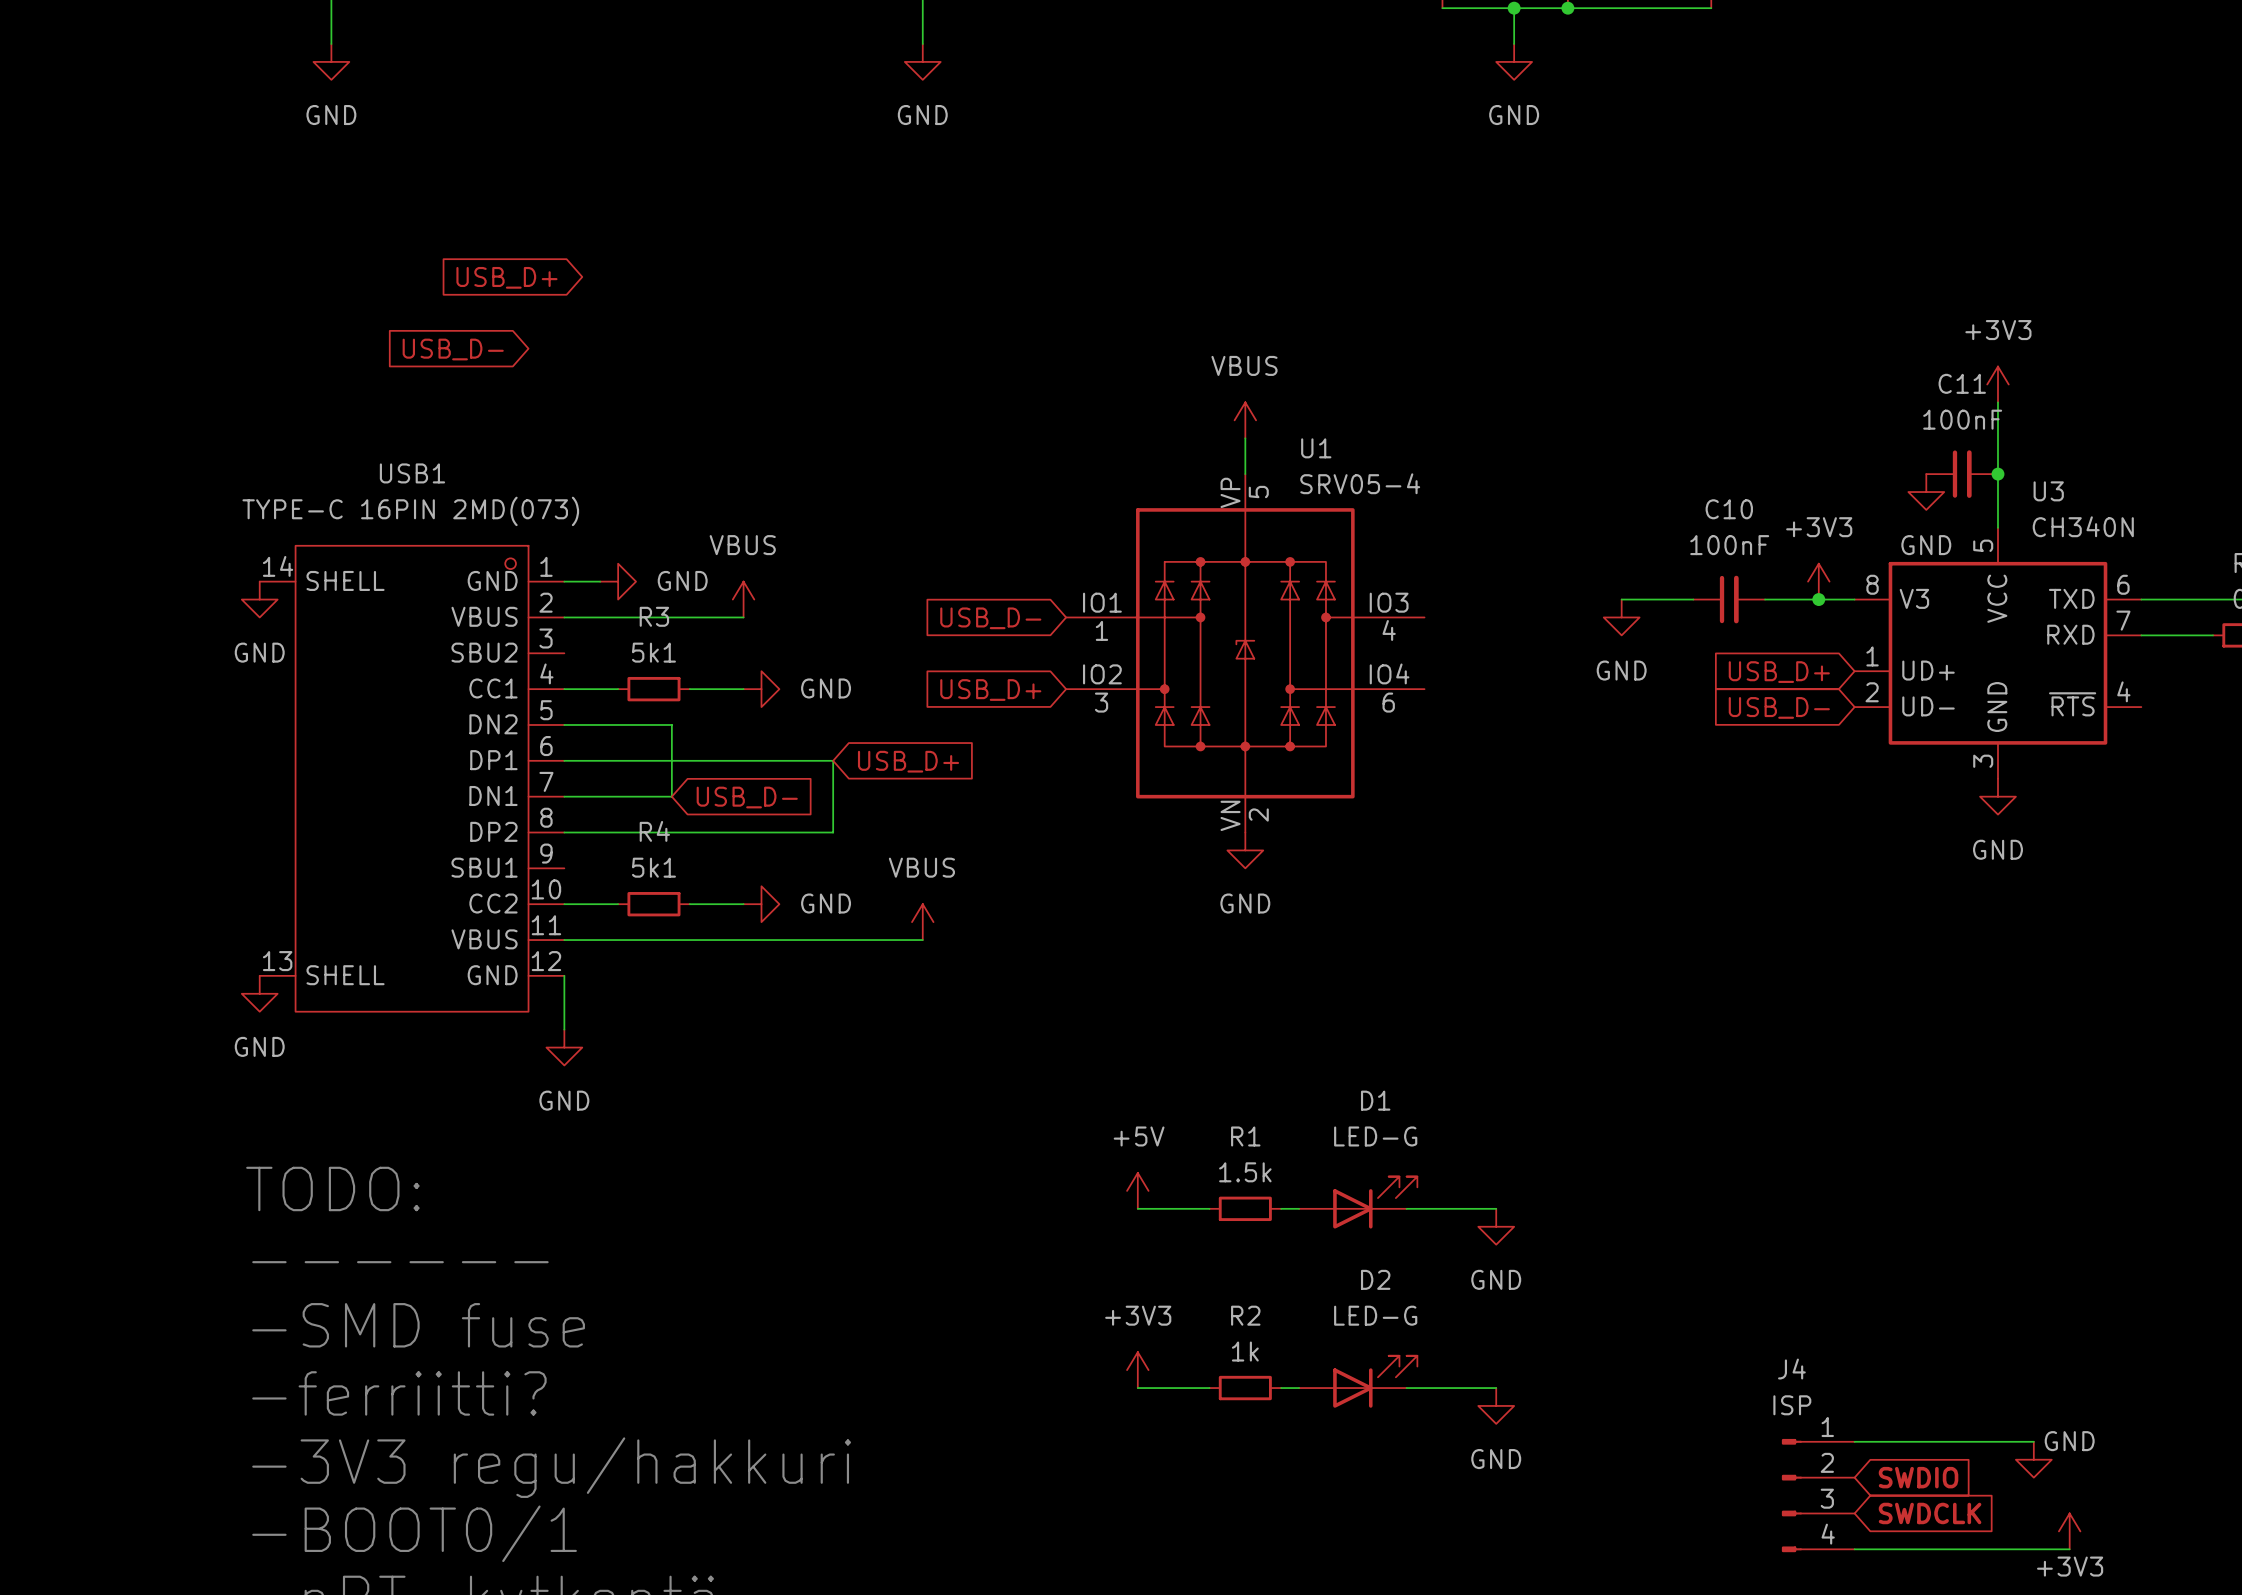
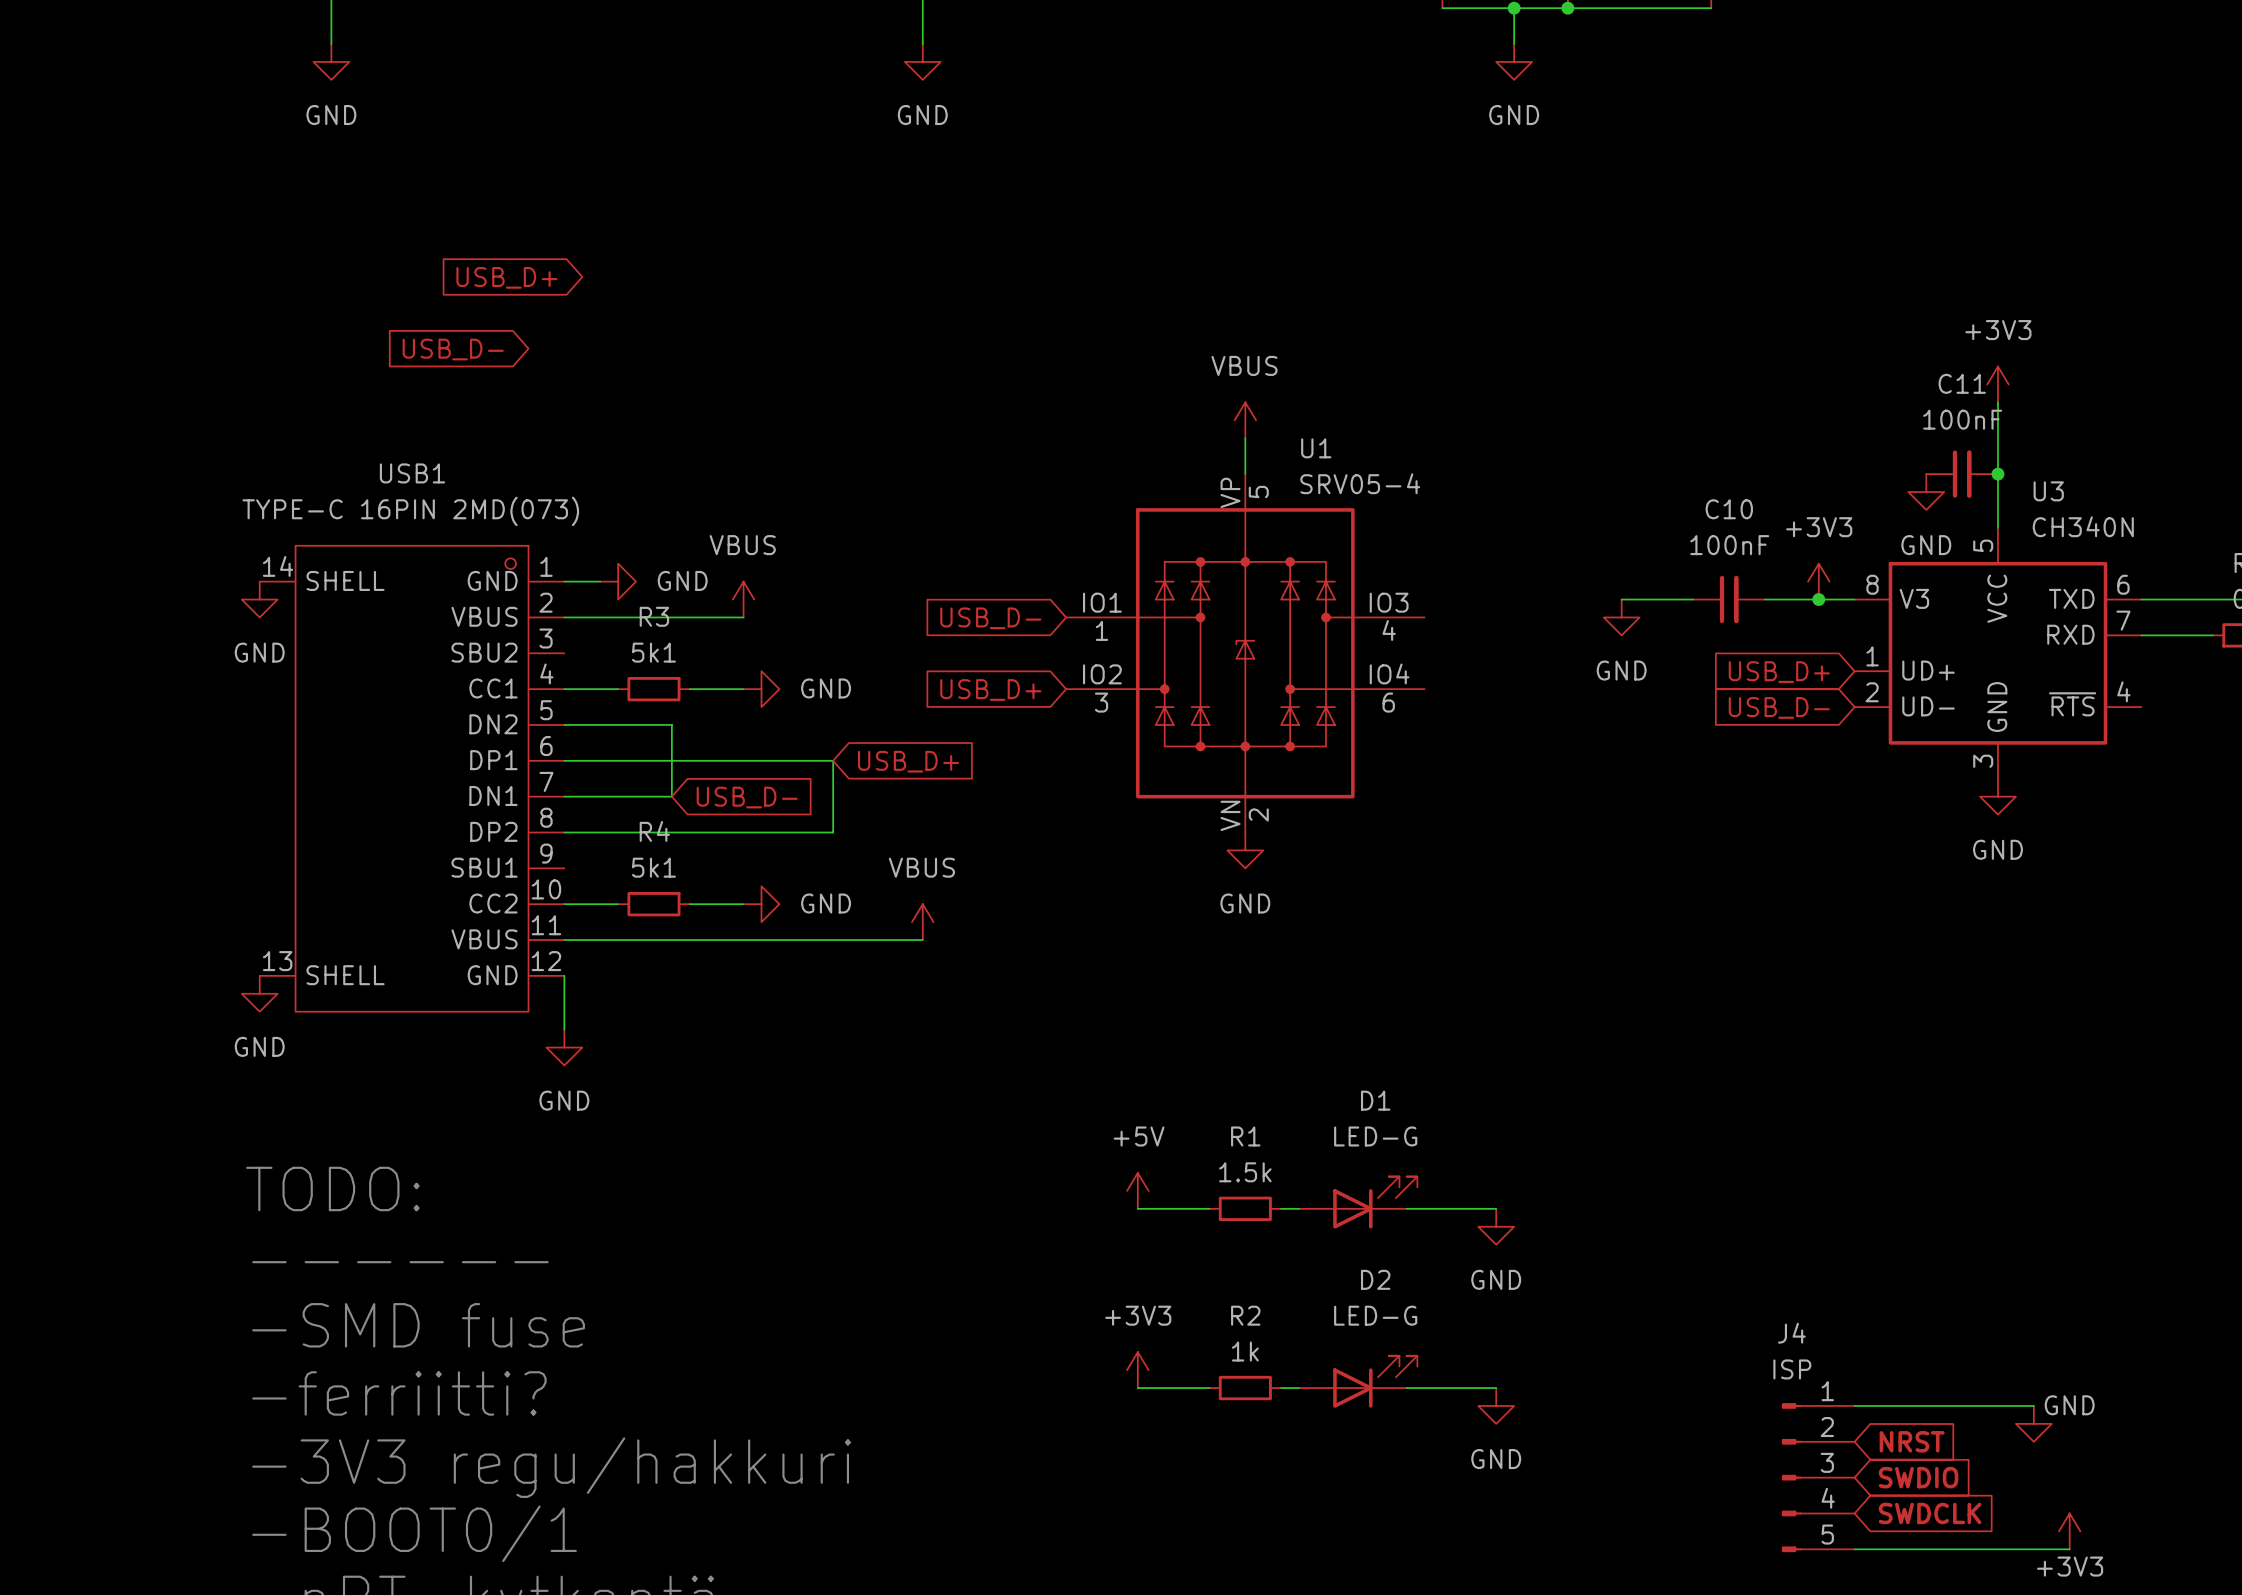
J4 symbol: [1781, 1438, 1855, 1553] -> [1781, 1403, 1855, 1553]
wire: (1854, 1441) (2033, 1441) -> (1854, 1405) (2033, 1405)
global label: none -> NRST (1912, 1441)
power symbol position: GND (2033, 1459) -> GND (2033, 1423)

